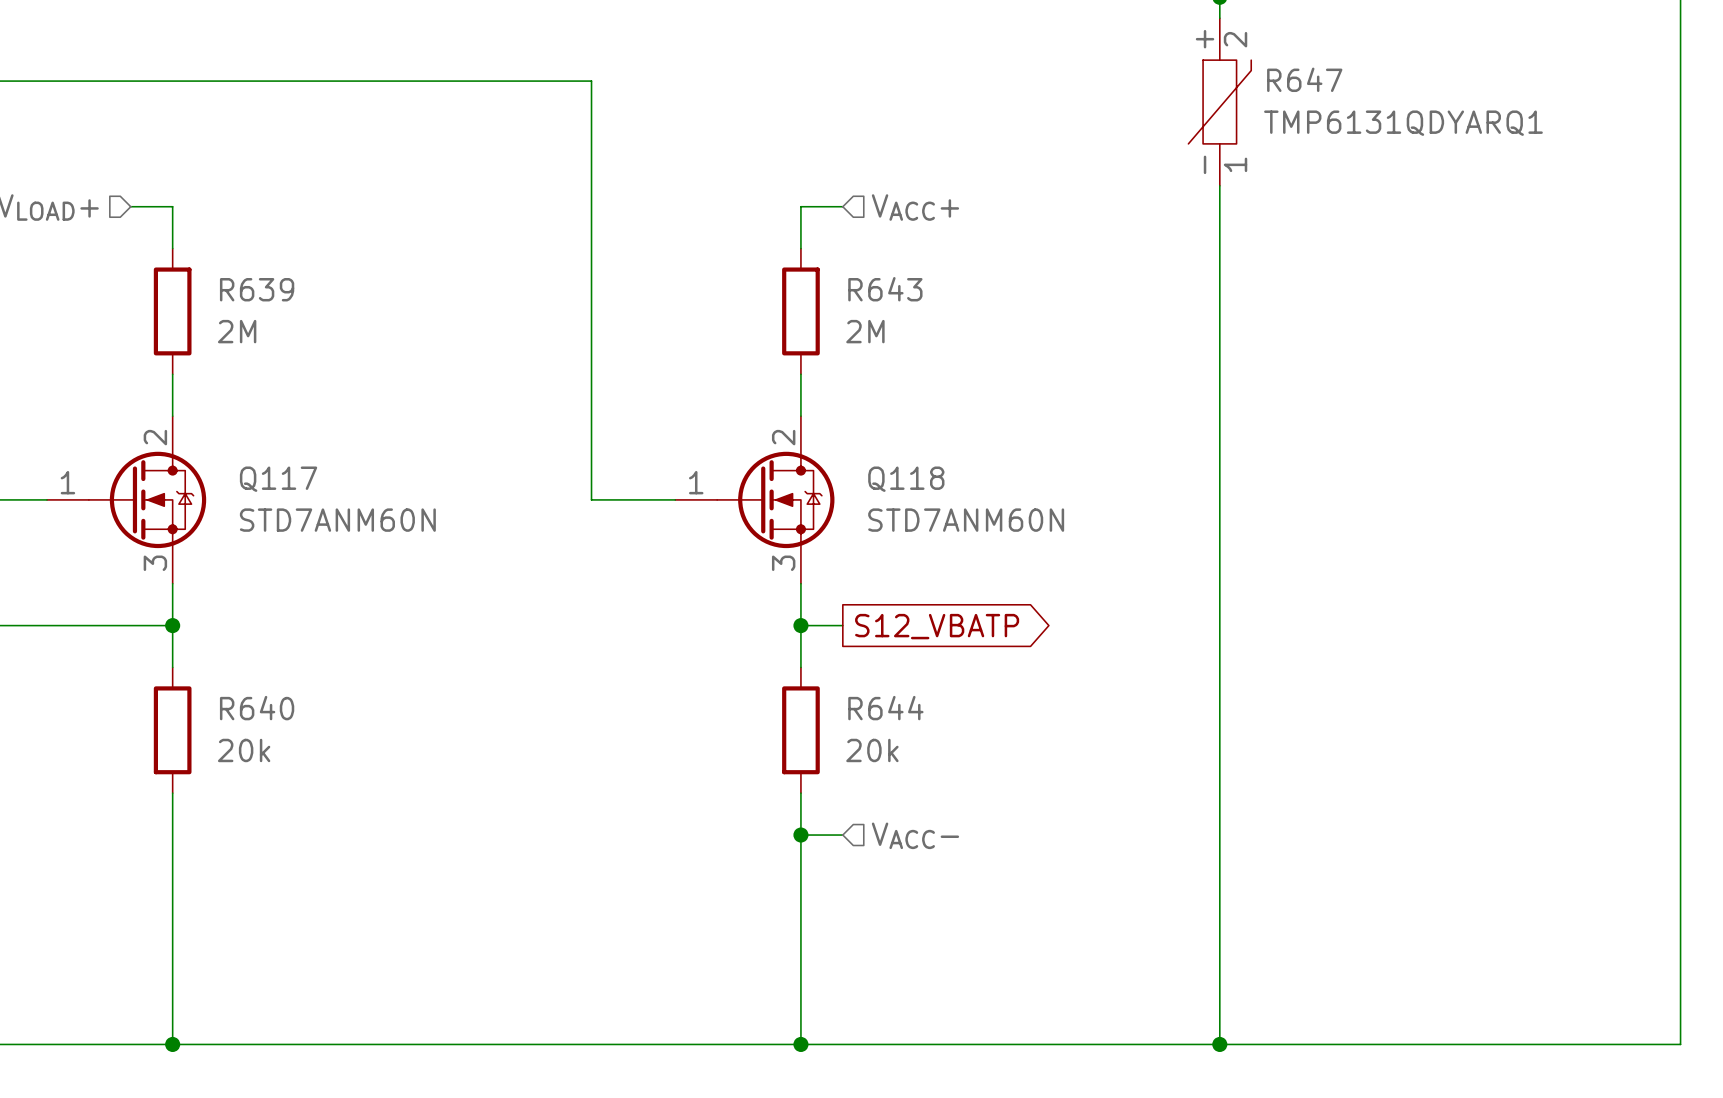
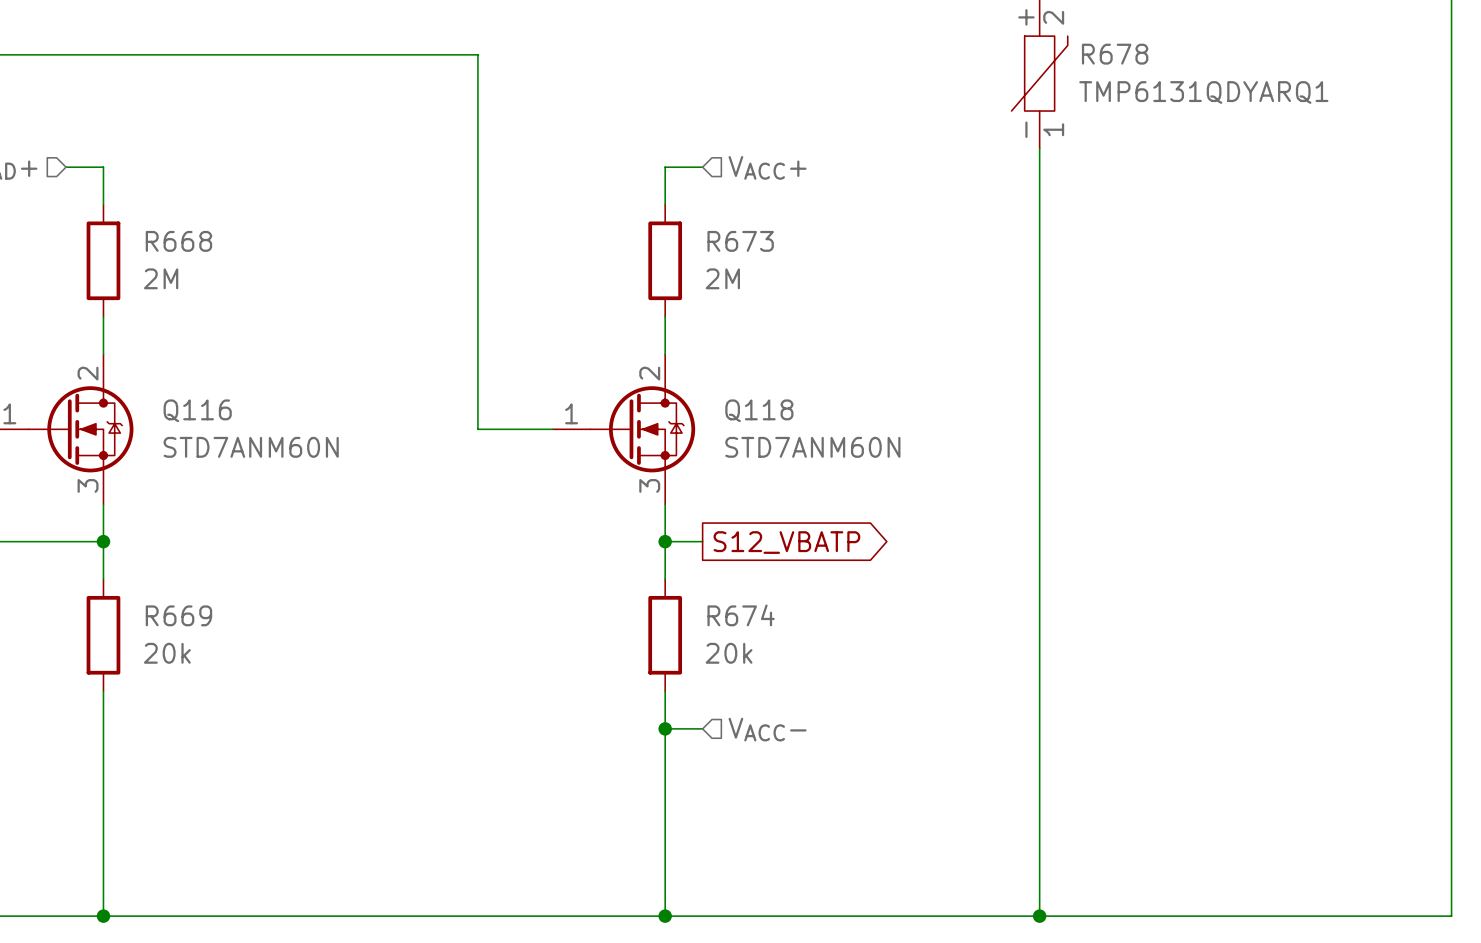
R647 name: R647 (1304, 79) -> R678 (1115, 54)
R639 name: R639 (257, 289) -> R668 (178, 241)
R643 name: R643 (885, 289) -> R673 (740, 241)
Q117 name: Q117 (278, 479) -> Q116 (197, 410)
R640 name: R640 (257, 708) -> R669 (178, 615)
R644 name: R644 (885, 708) -> R674 (741, 615)

